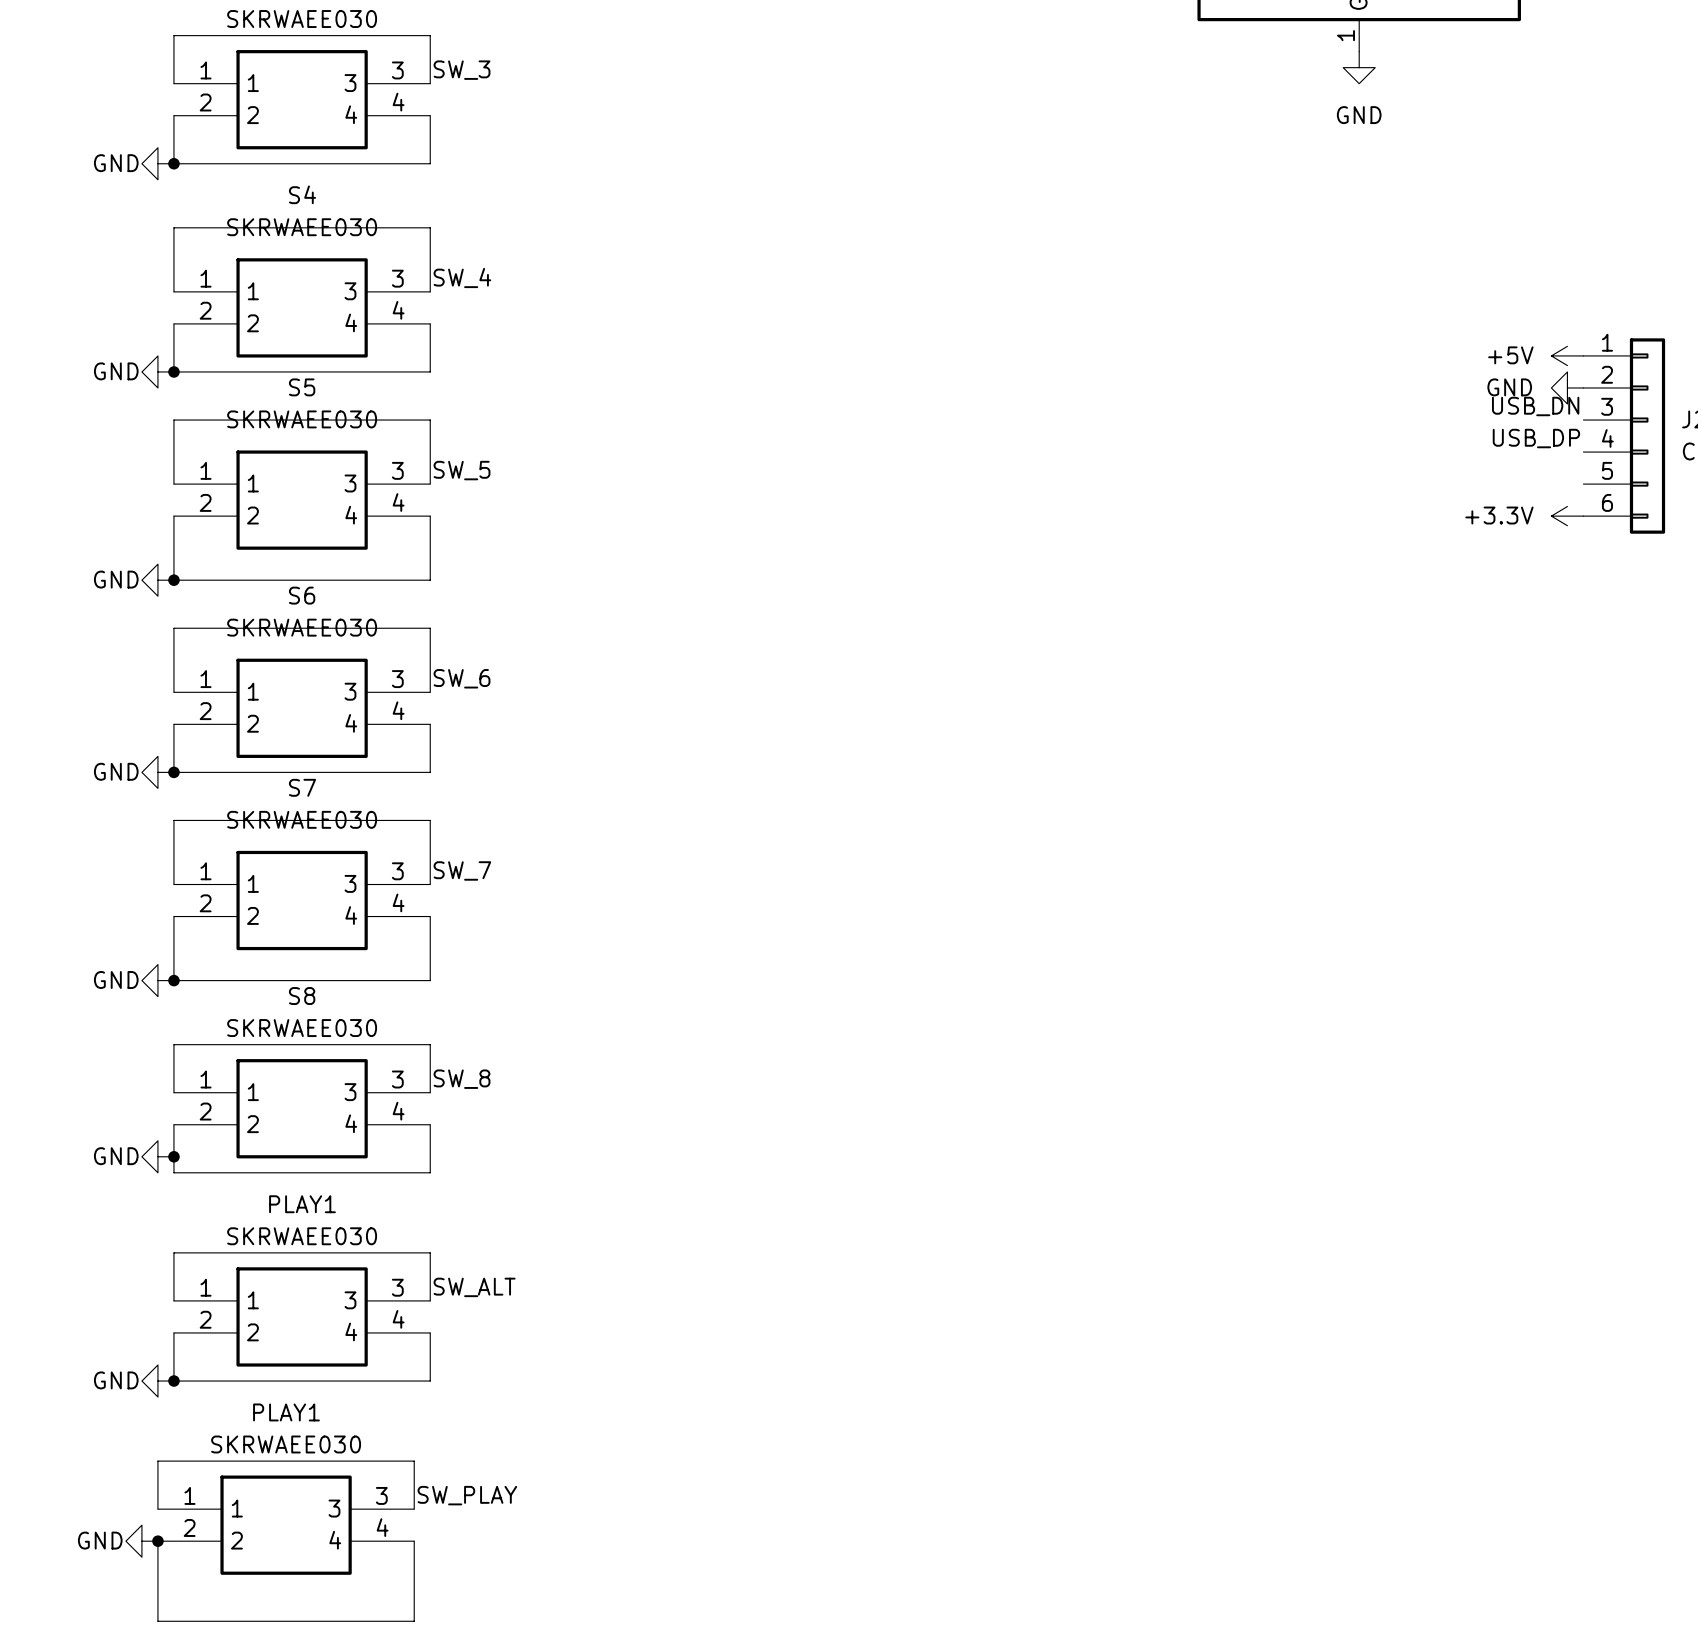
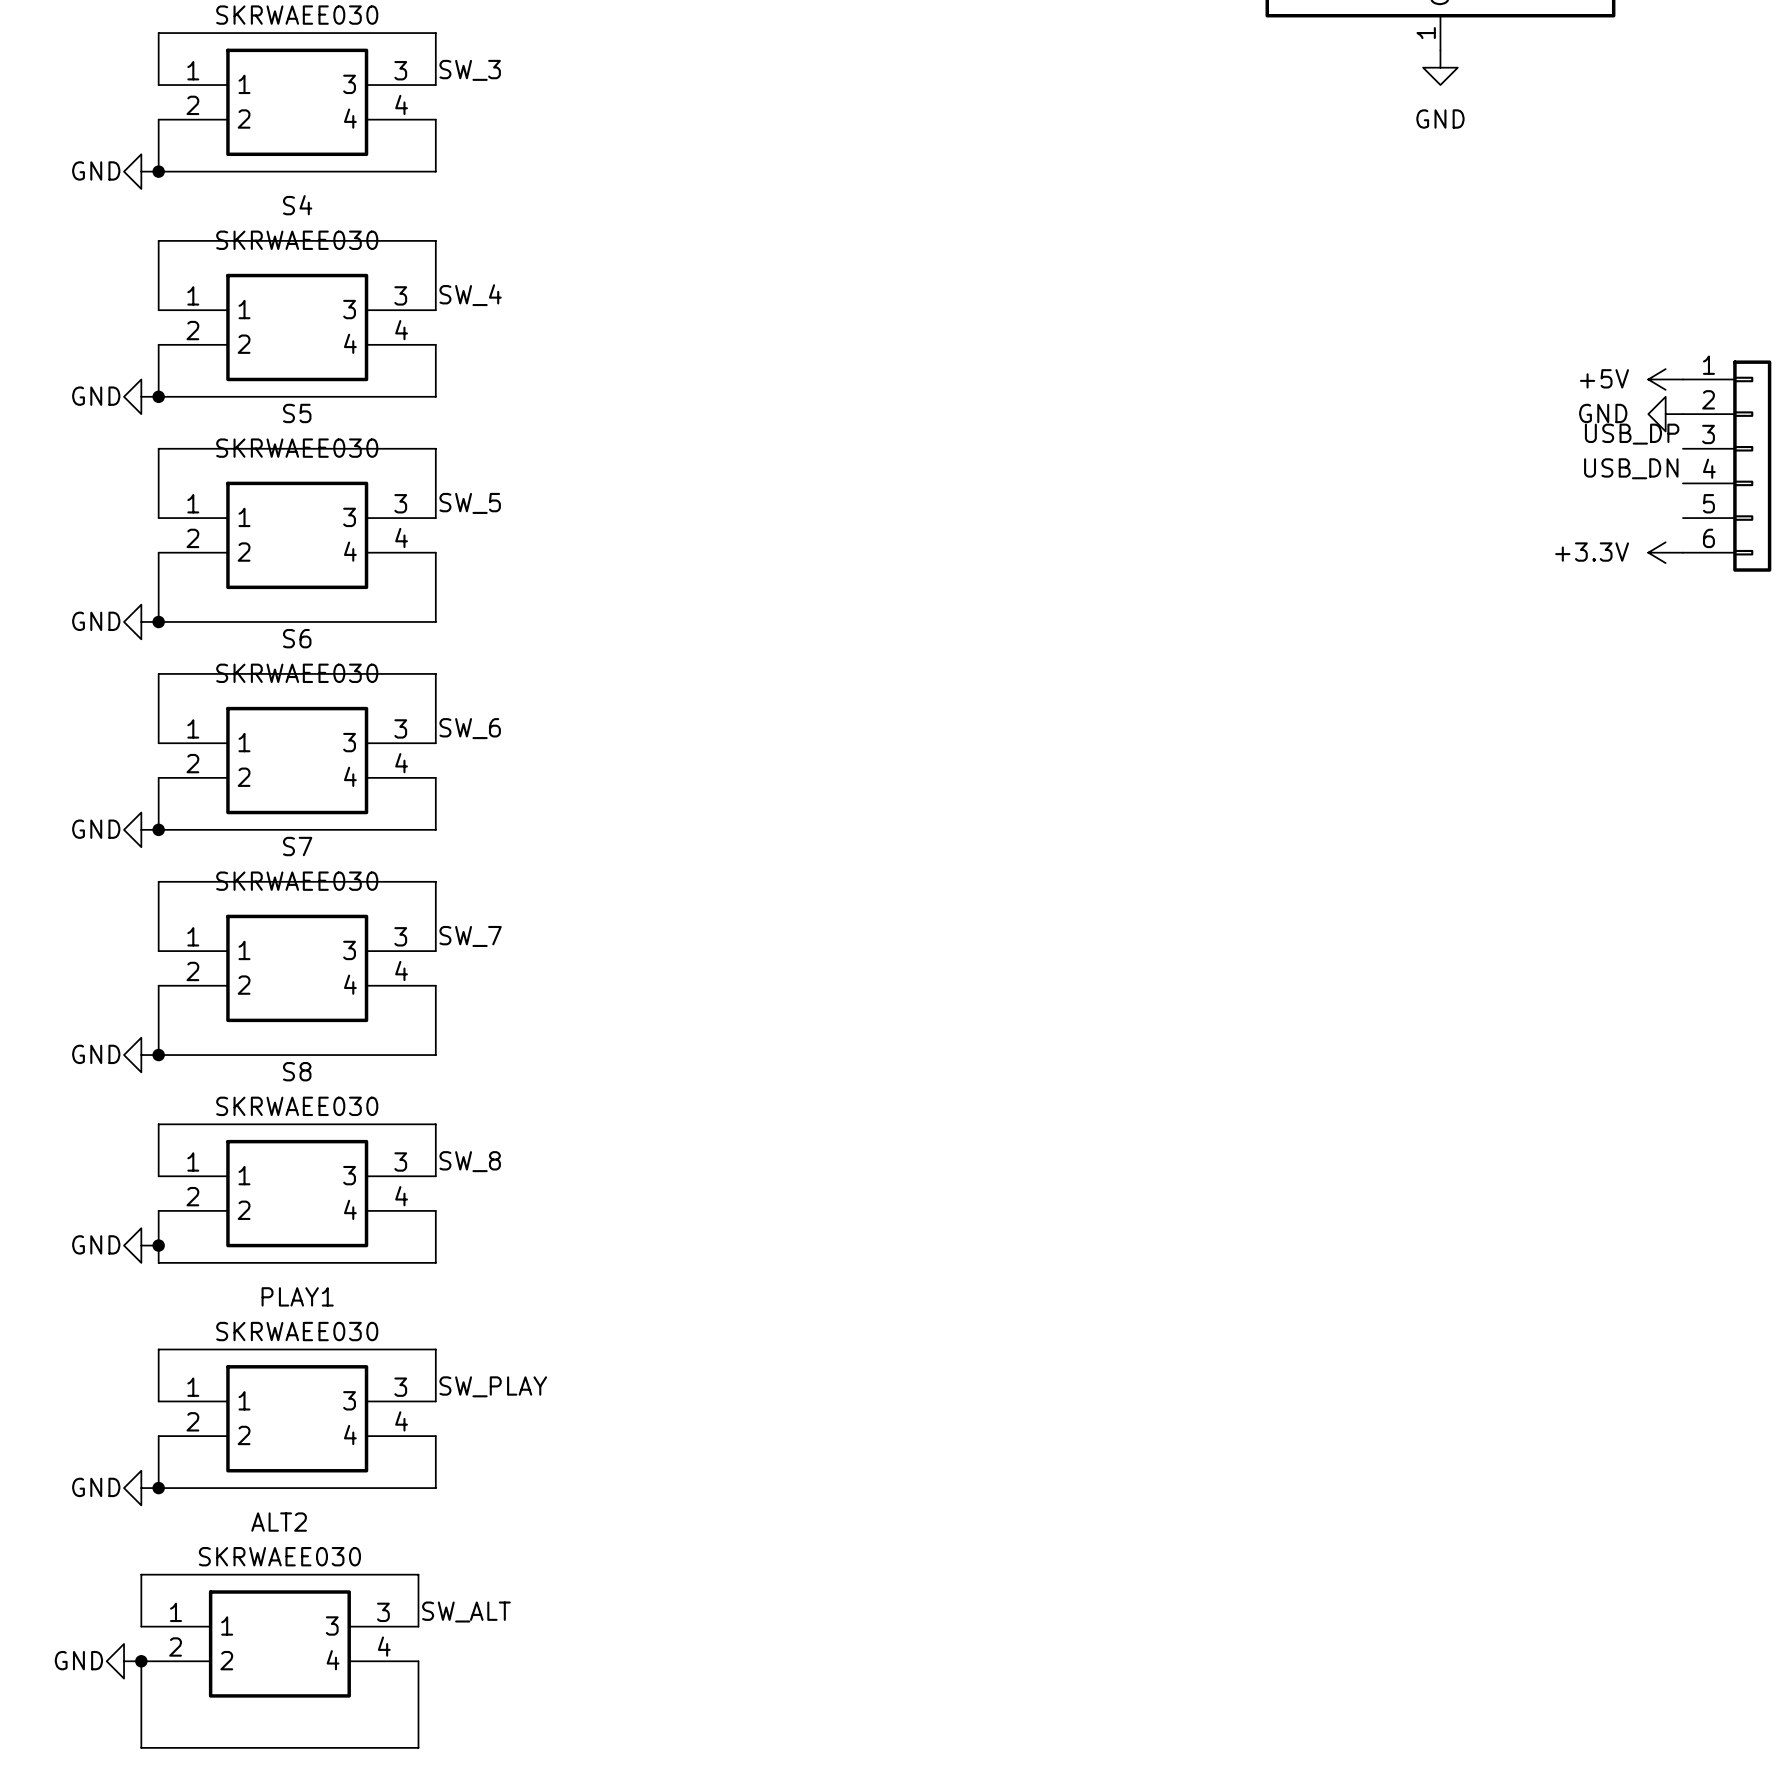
label: USB_DN (1535, 406) -> USB_DP (1632, 434)
label: USB_DP (1536, 438) -> USB_DN (1631, 468)
label: SW_ALT (474, 1287) -> SW_PLAY (493, 1386)
PLAY1 name: PLAY1 (286, 1412) -> ALT2 (279, 1522)
label: SW_PLAY (467, 1495) -> SW_ALT (466, 1612)

